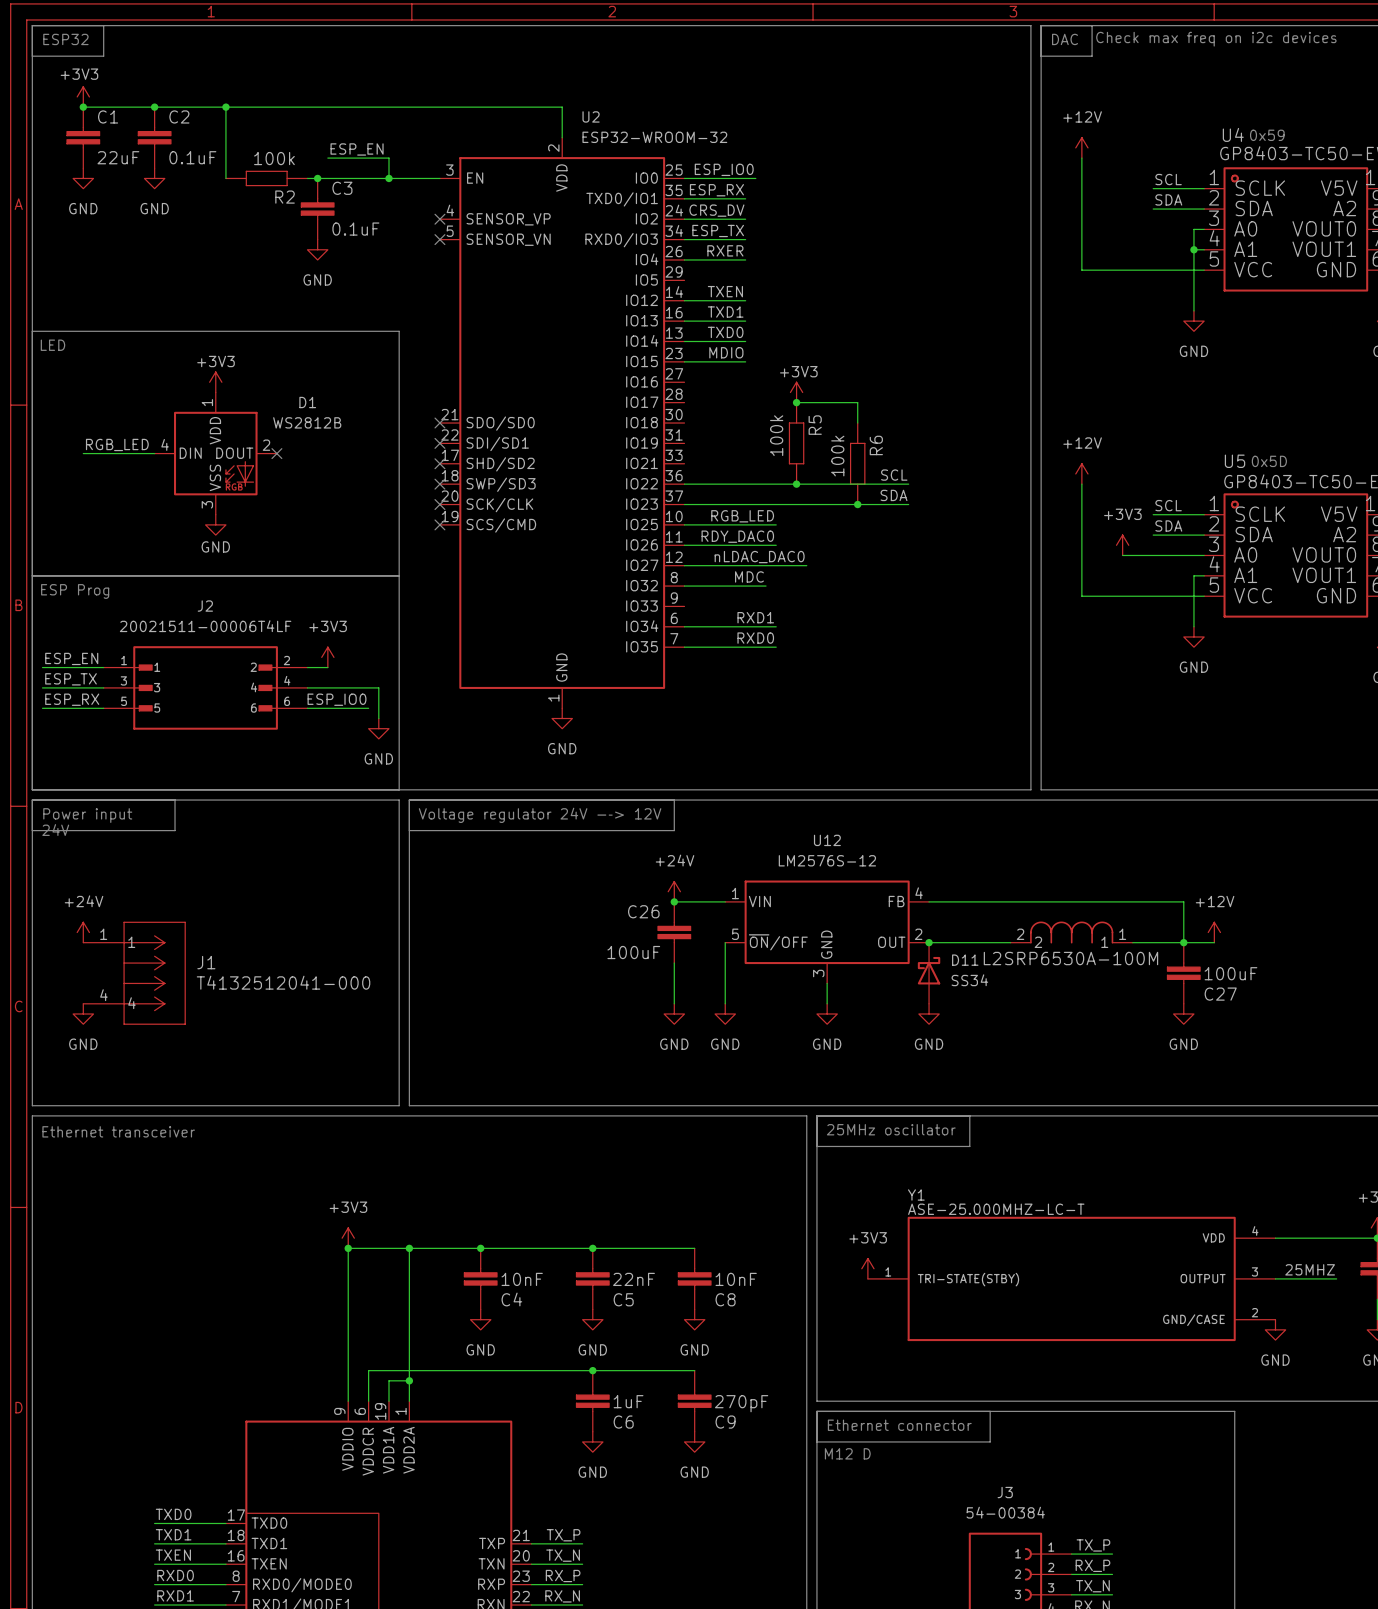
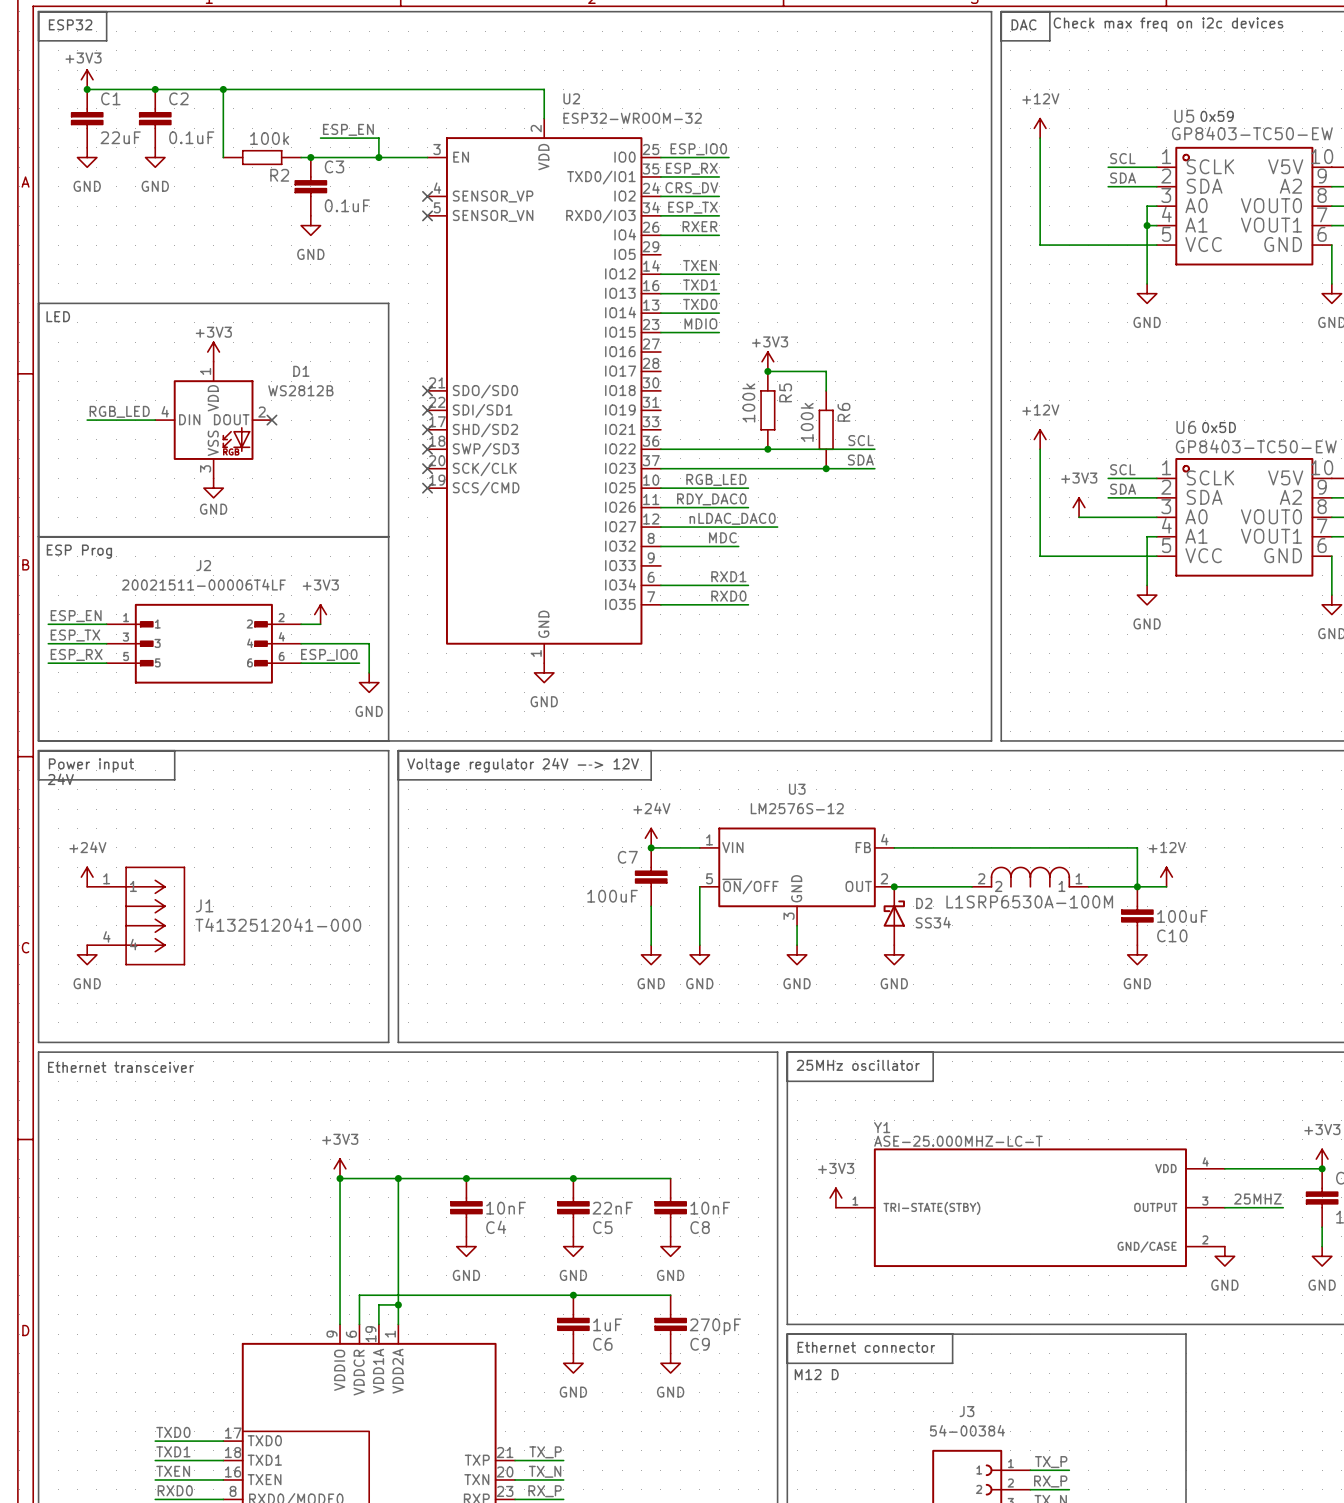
U4 name: U4 (1233, 134) -> U5 (1184, 116)
U5 name: U5 (1235, 461) -> U6 (1186, 427)
U12 name: U12 (827, 840) -> U3 (797, 789)
C26 name: C26 (643, 911) -> C7 (627, 857)
L2 name: L2 (992, 958) -> L1 (954, 901)
D11 name: D11 (965, 960) -> D2 (924, 903)
C27 name: C27 (1220, 994) -> C10 (1172, 935)

